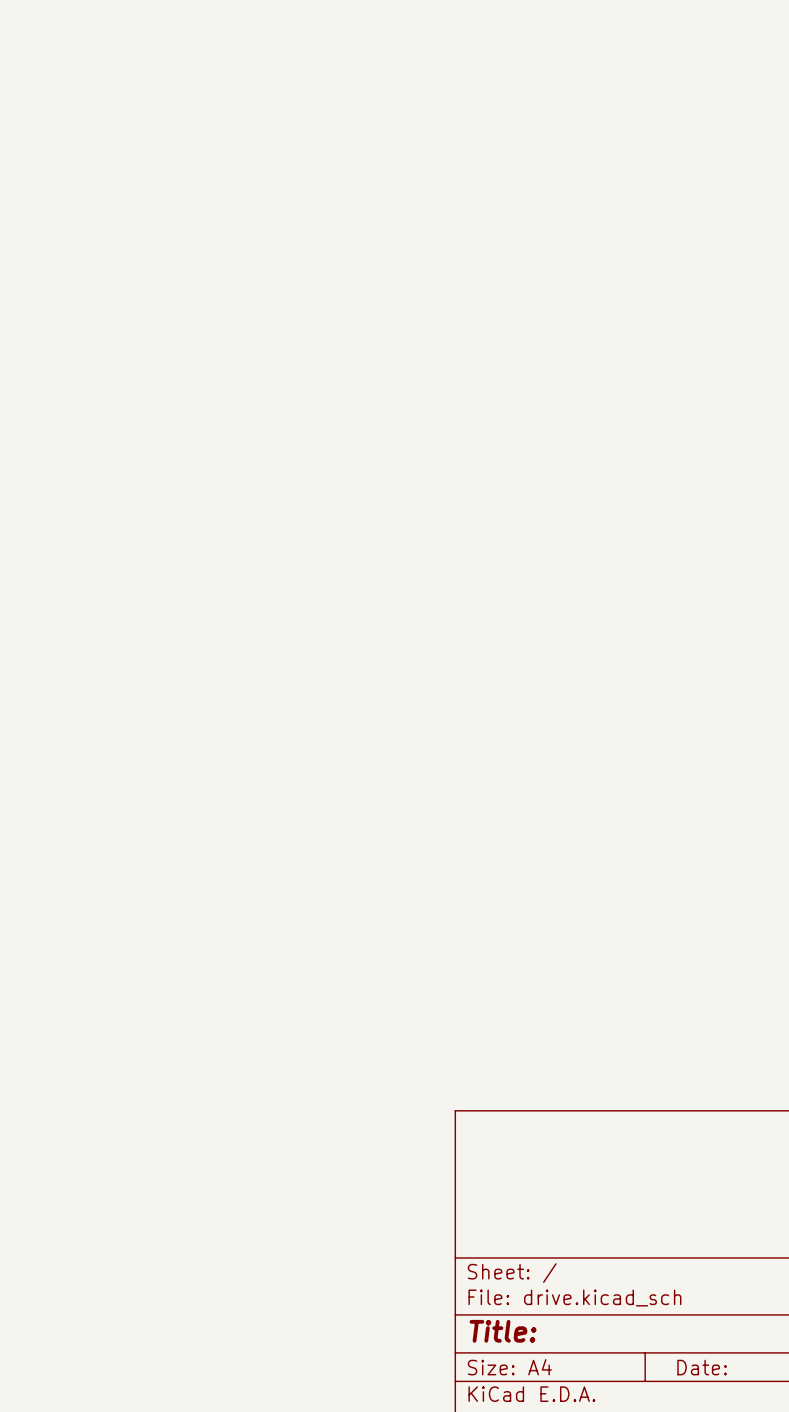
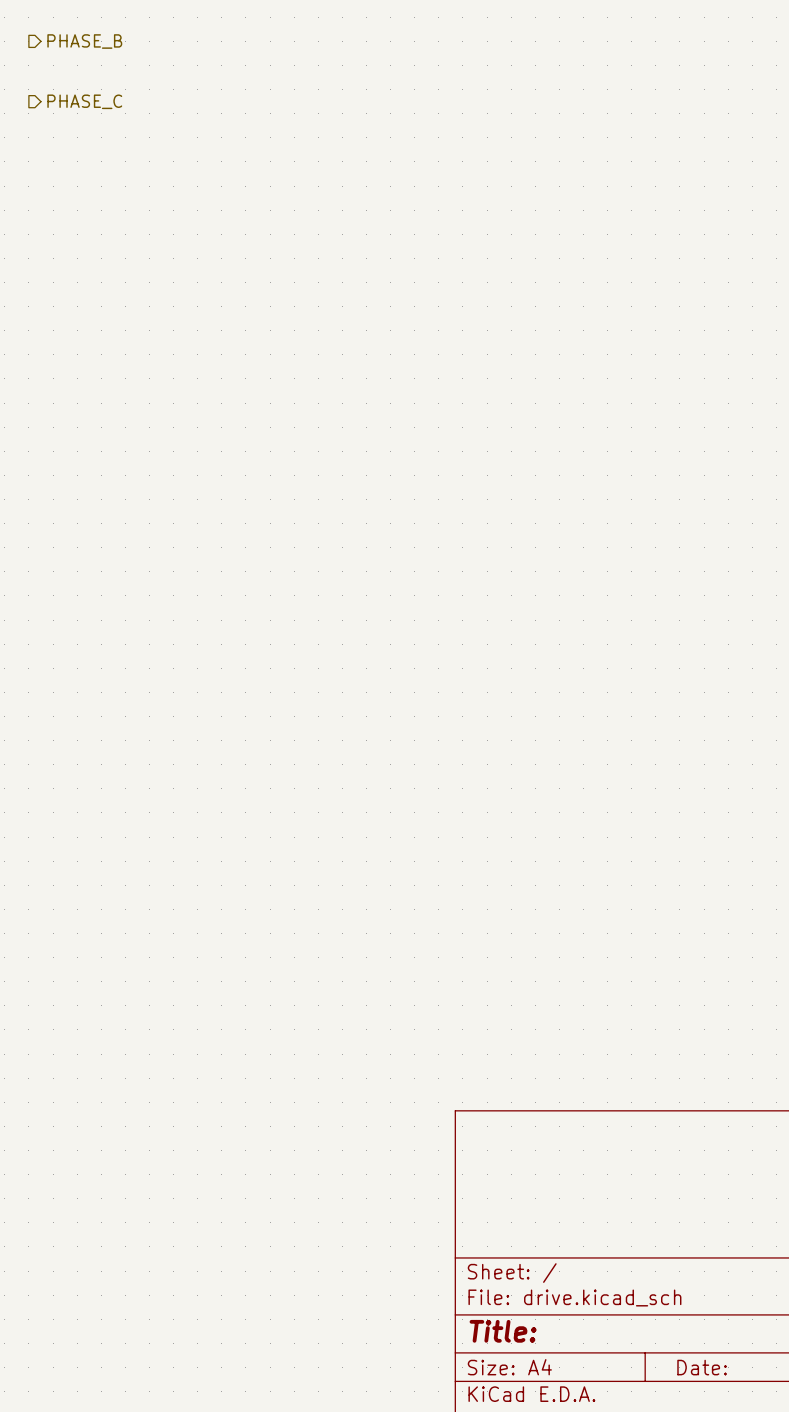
hierarchical label: none -> PHASE_B (84, 41)
hierarchical label: none -> PHASE_C (84, 101)

